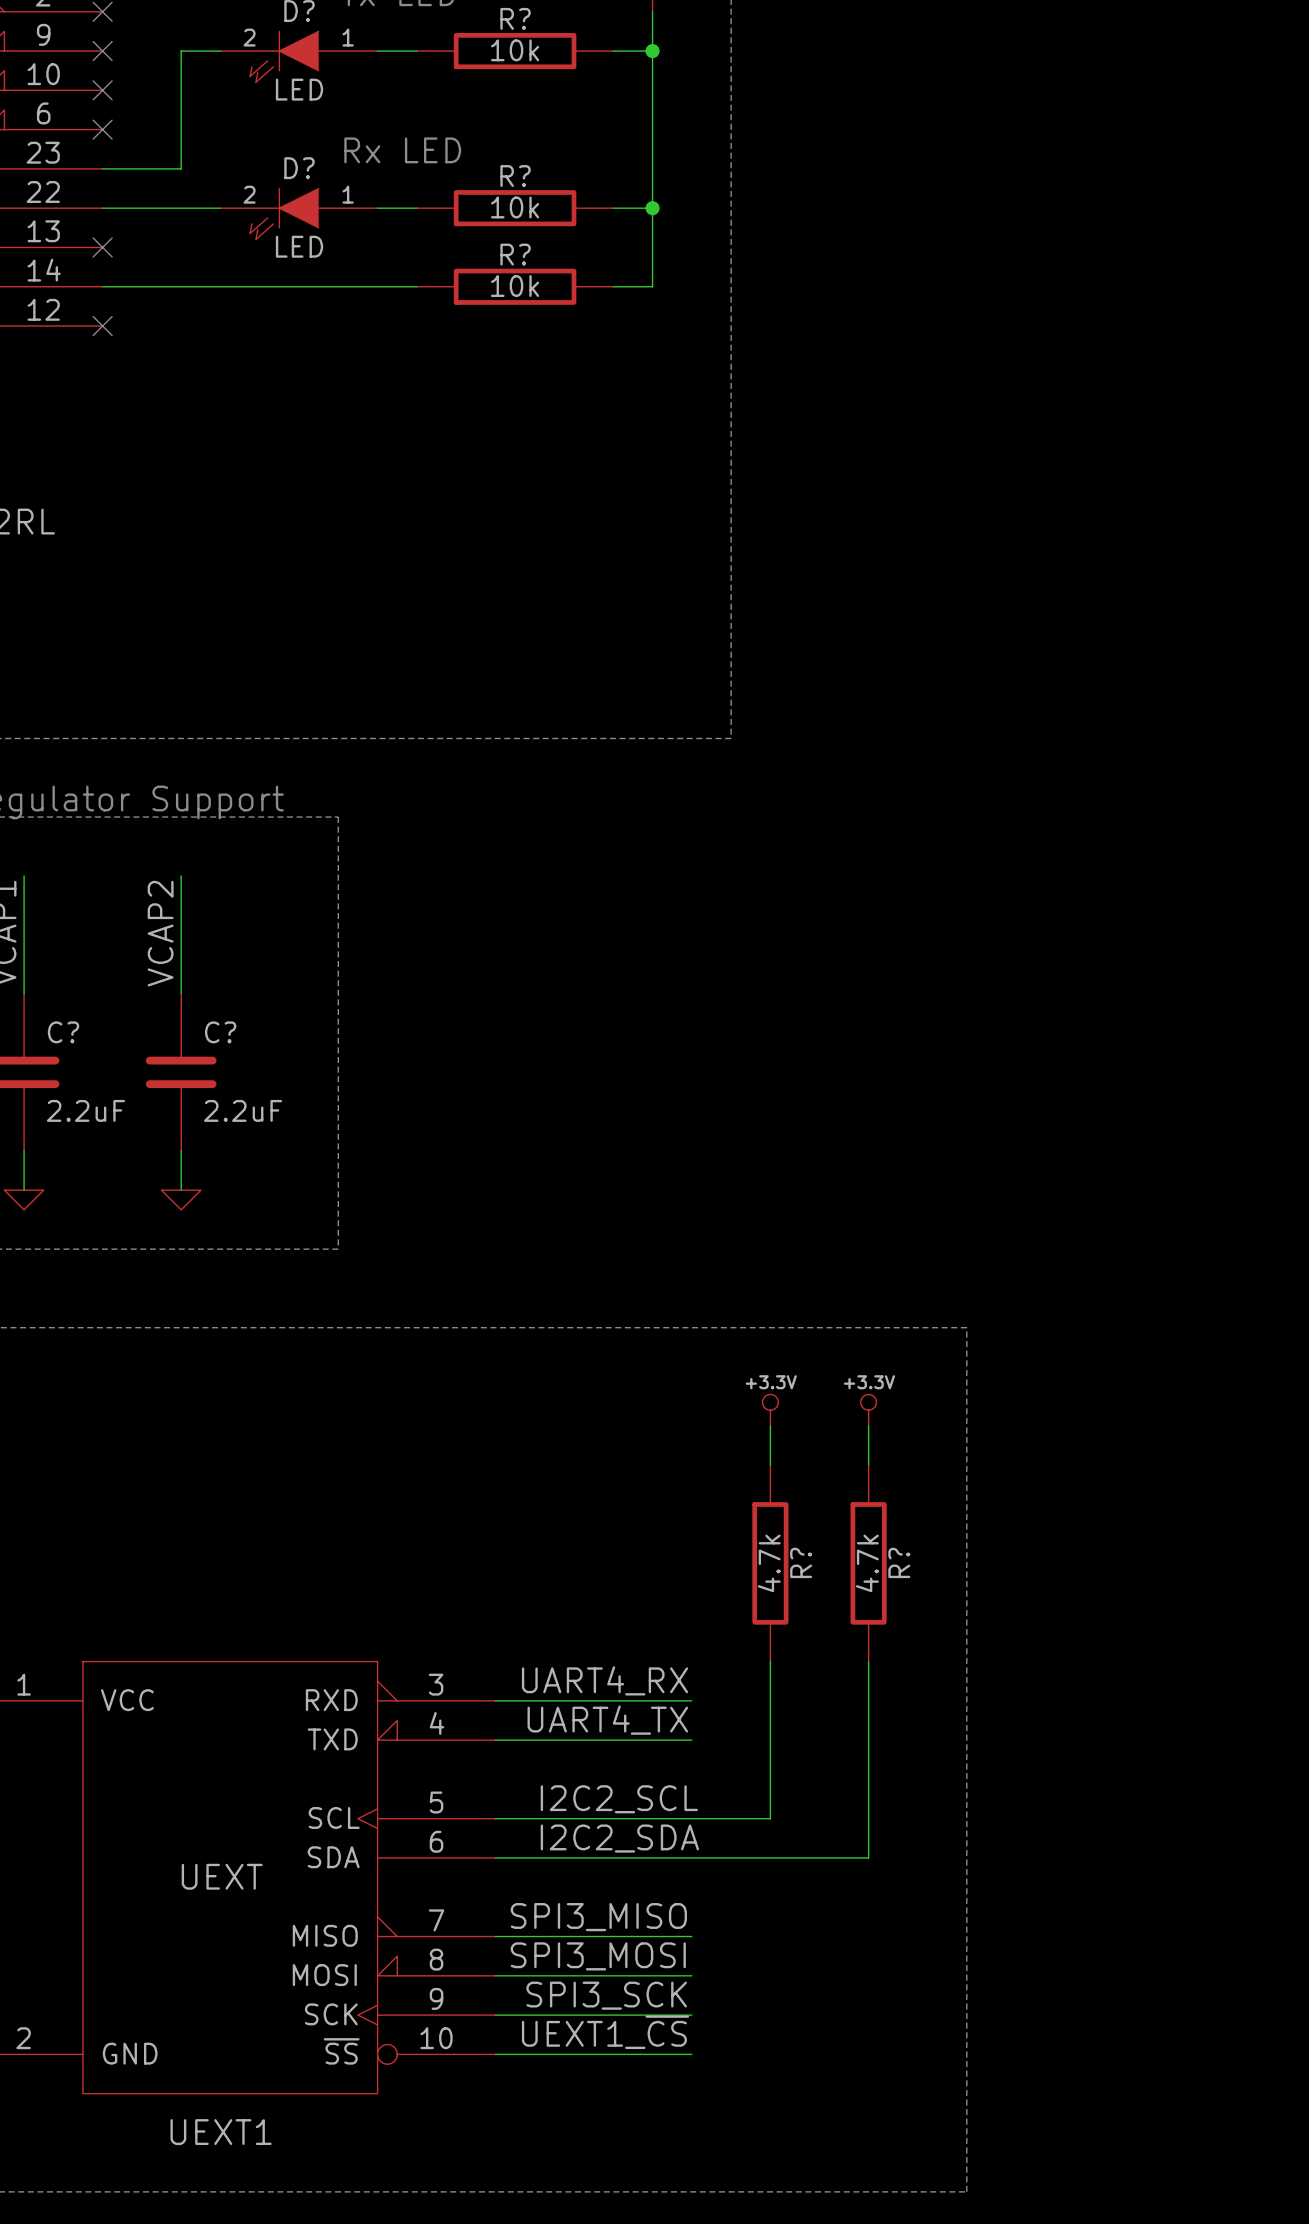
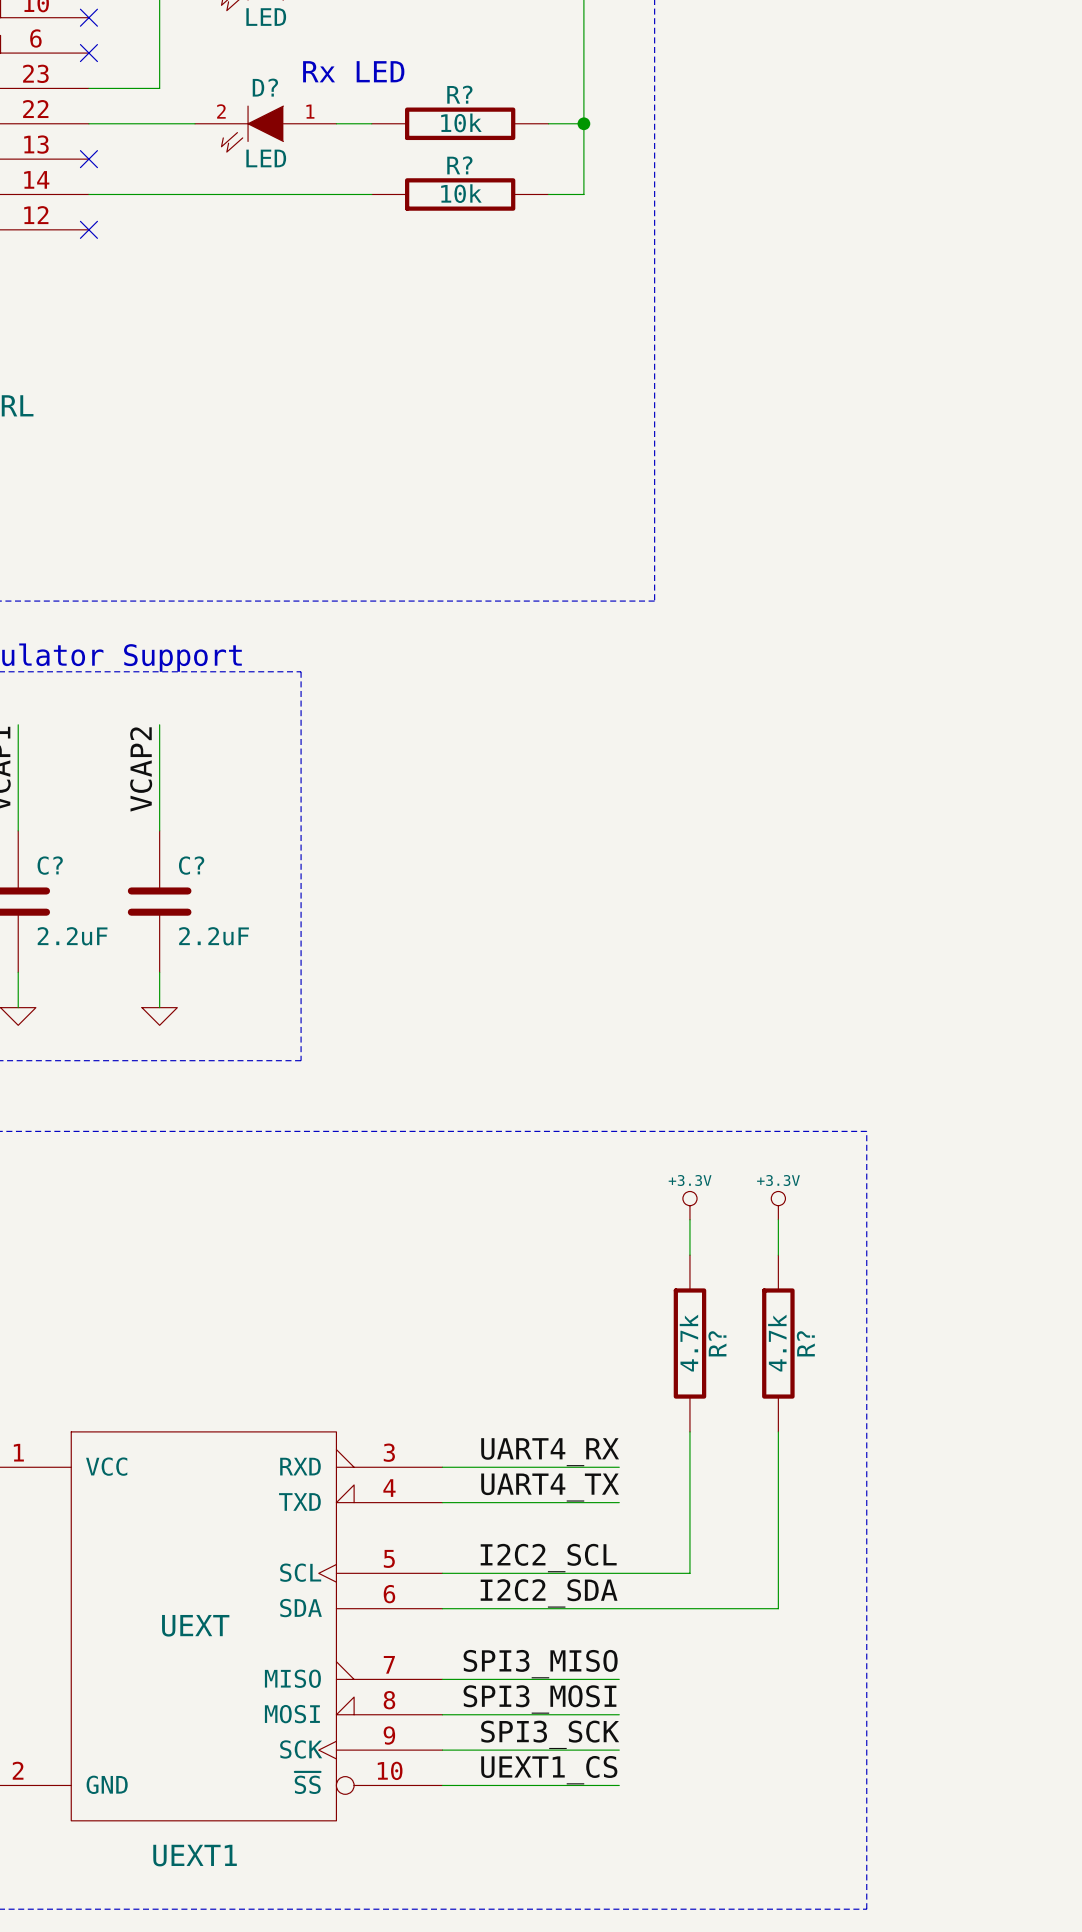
label: UEXT1_~{CS} (605, 2032) -> UEXT1_CS (549, 1770)

